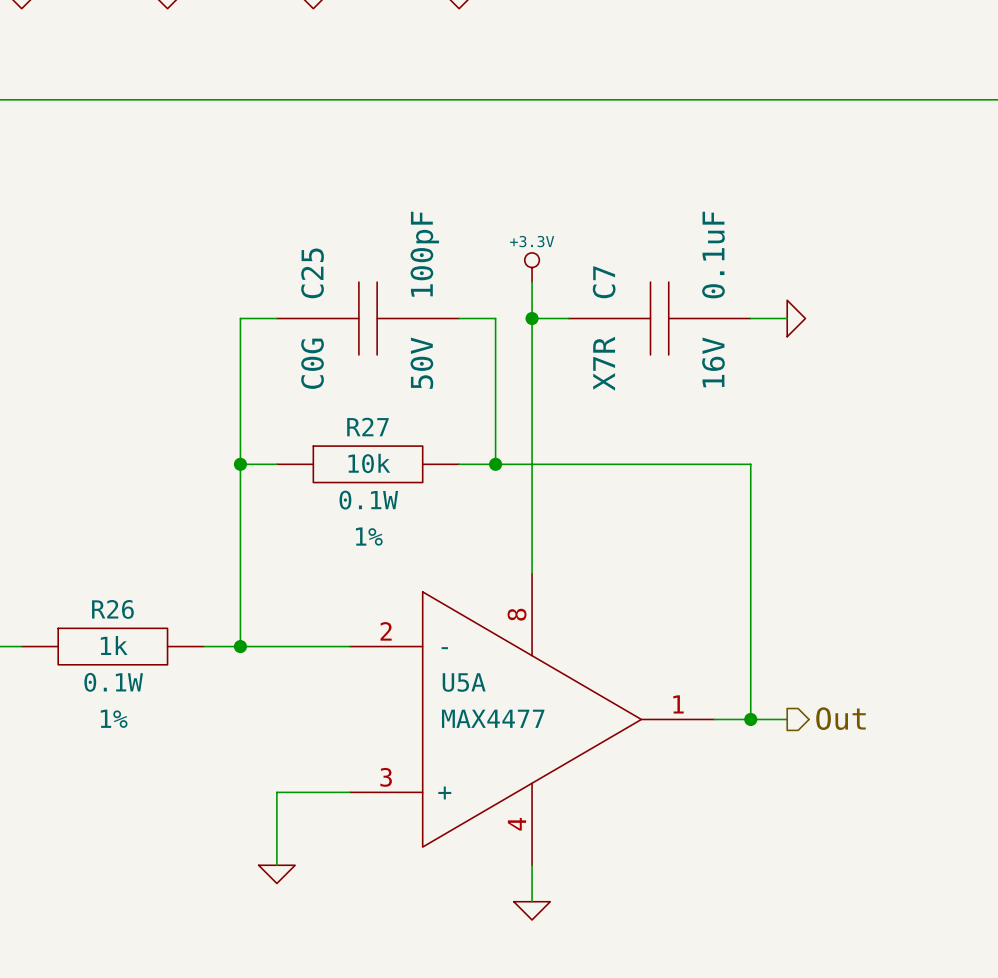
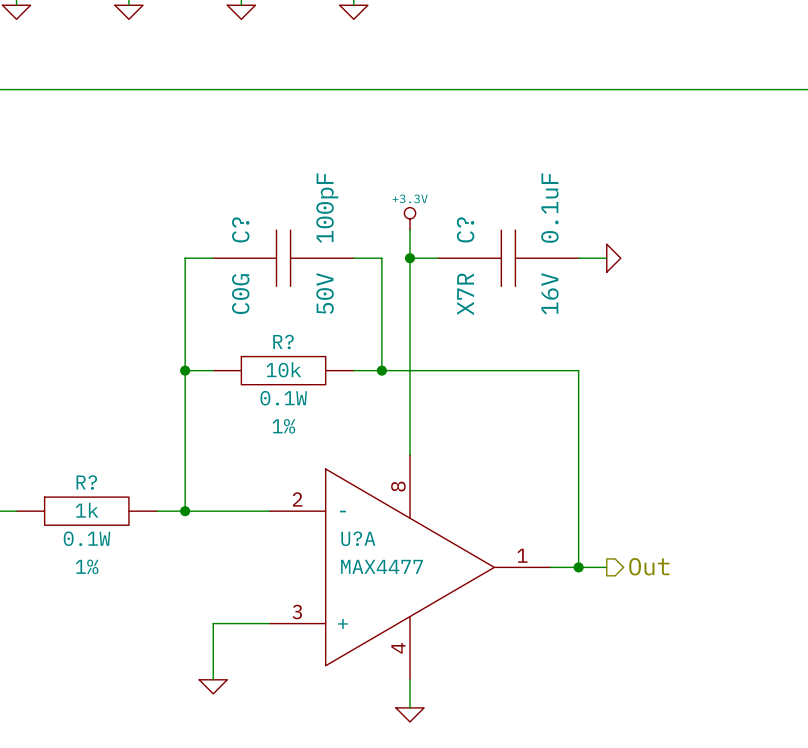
C25 name: C25 (312, 273) -> C? (240, 229)
C7 name: C7 (604, 282) -> C? (465, 229)
R27 name: R27 (367, 427) -> R? (283, 341)
R26 name: R26 (112, 609) -> R? (86, 482)
U5A name: U5A (464, 682) -> U?A (358, 538)

